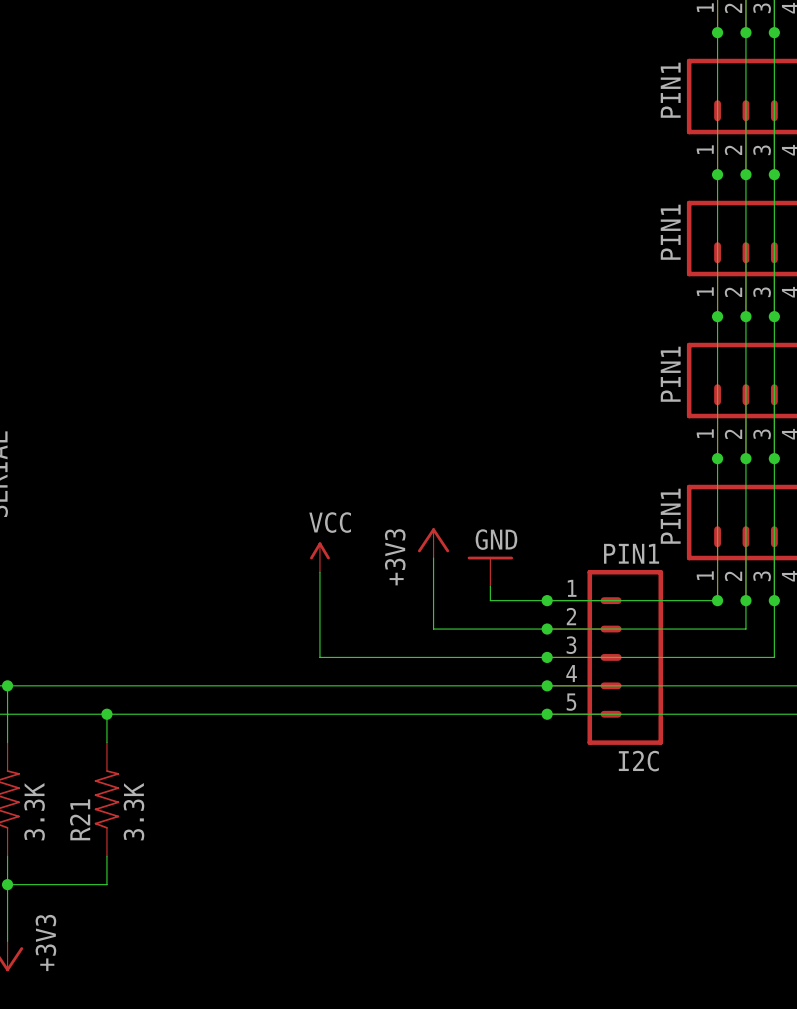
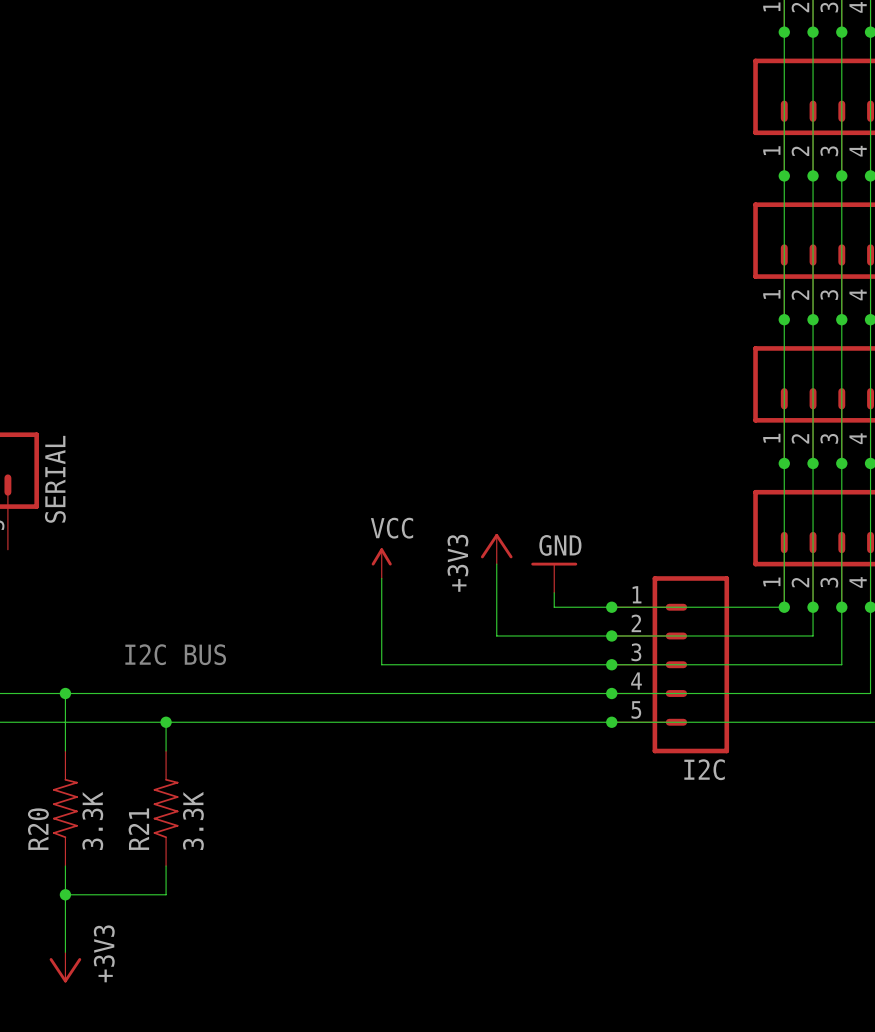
part value: PIN1 (670, 90) -> none
part value: PIN1 (670, 232) -> none
part value: PIN1 (670, 374) -> none
part value: PIN1 (670, 516) -> none
I2C value: PIN1 (631, 553) -> none
text: none -> I2C BUS (175, 654)

